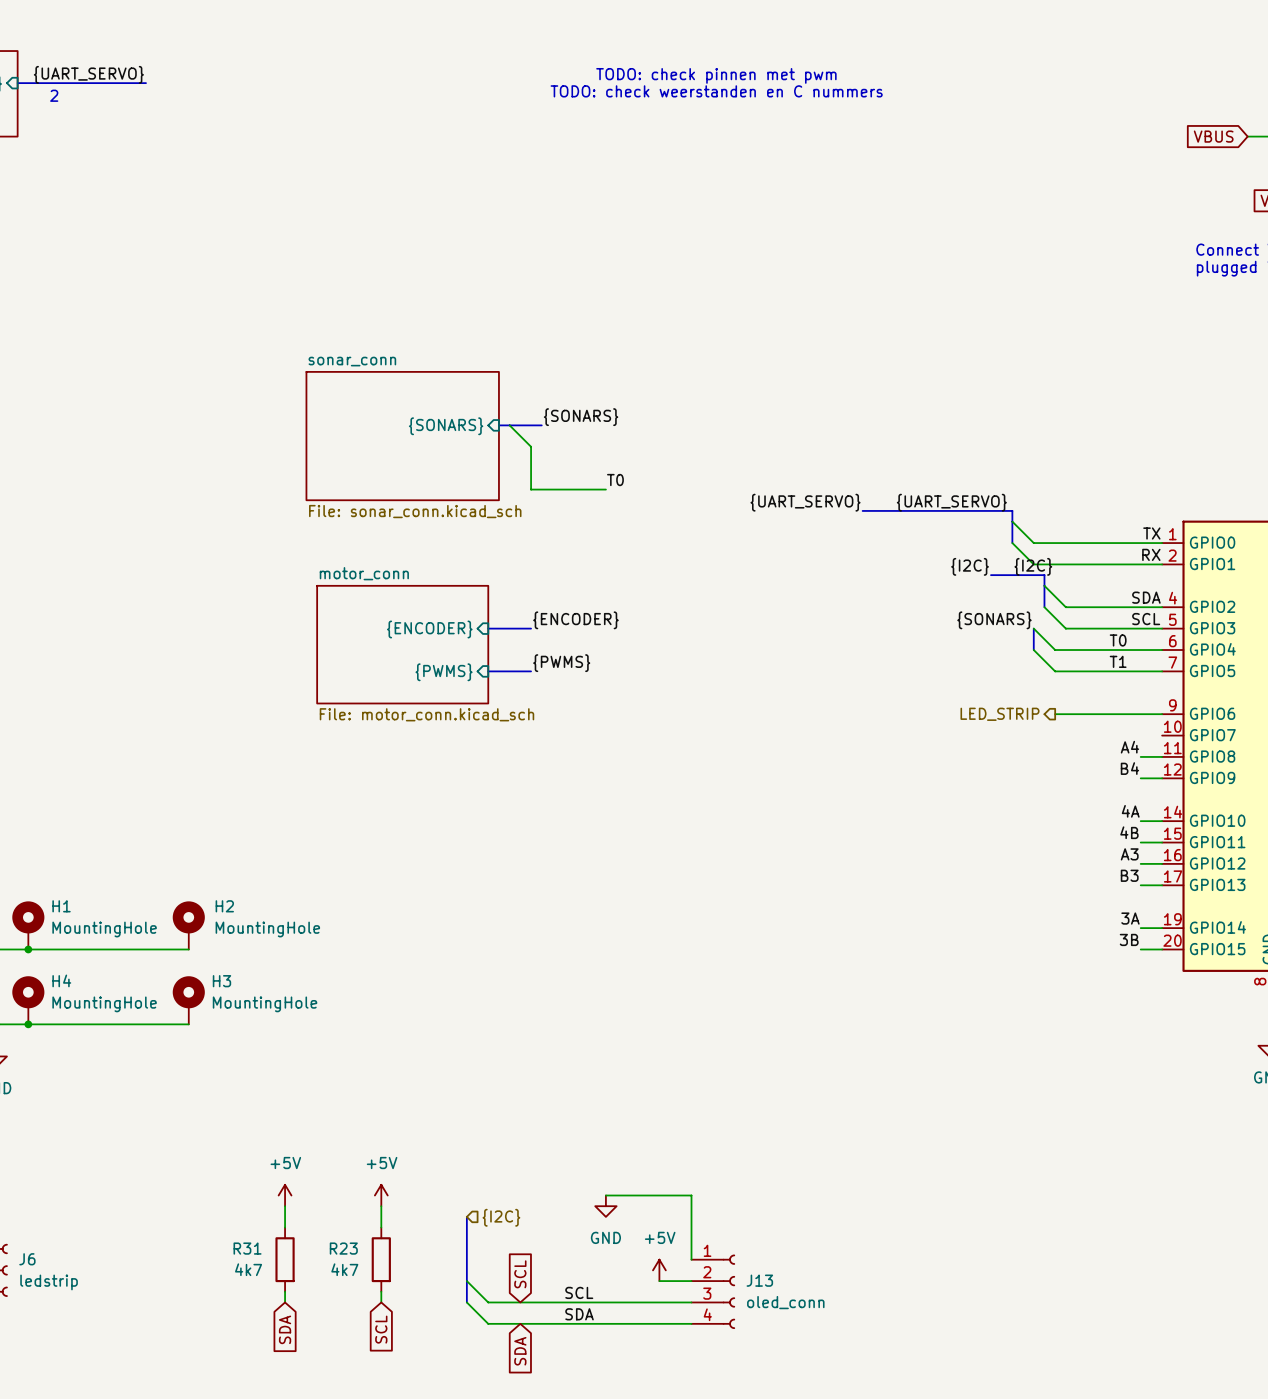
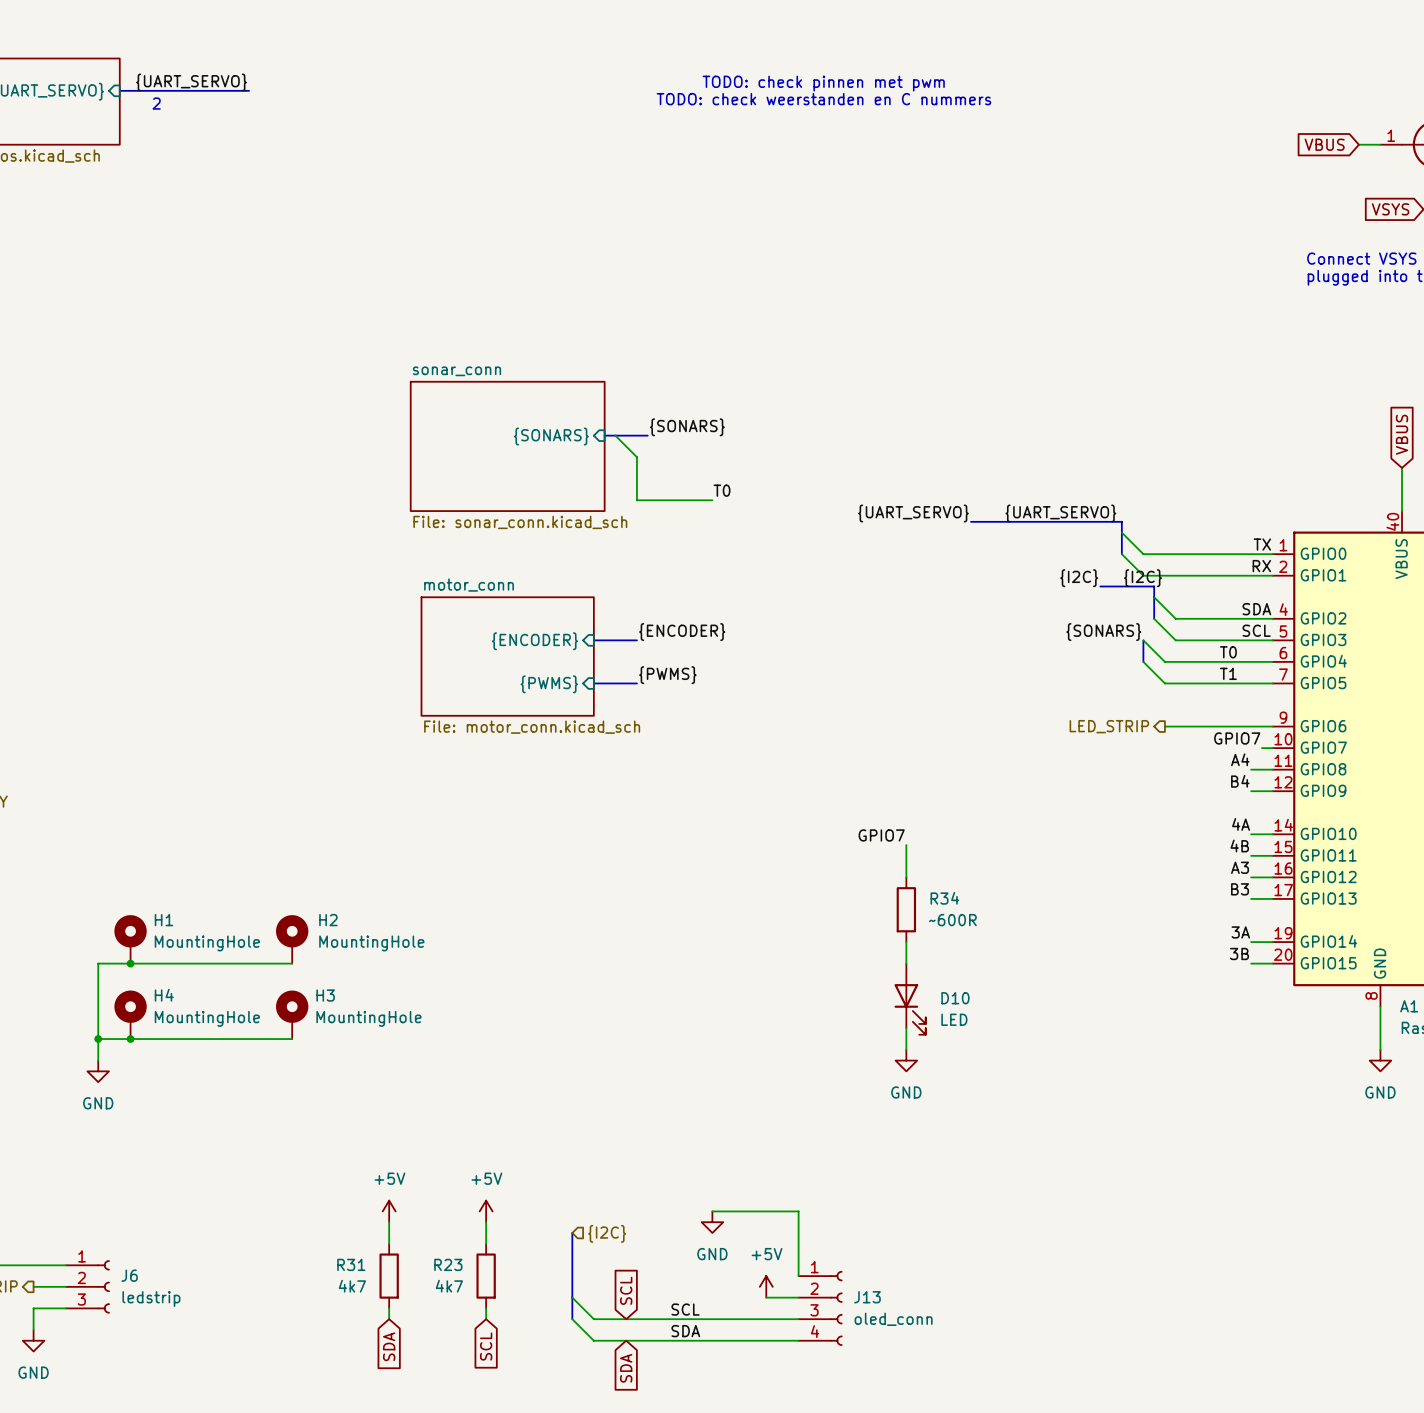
label: none -> GPIO7 (1237, 738)
wire: none -> (1261, 748) (1272, 748)
label: none -> GPIO7 (881, 835)
wire: none -> (906, 845) (906, 877)
R34: none -> ~600R (906, 909)
wire: none -> (906, 942) (906, 963)
D10: none -> LED (910, 999)
wire: none -> (906, 1028) (906, 1049)
power symbol: none -> GND (906, 1060)

